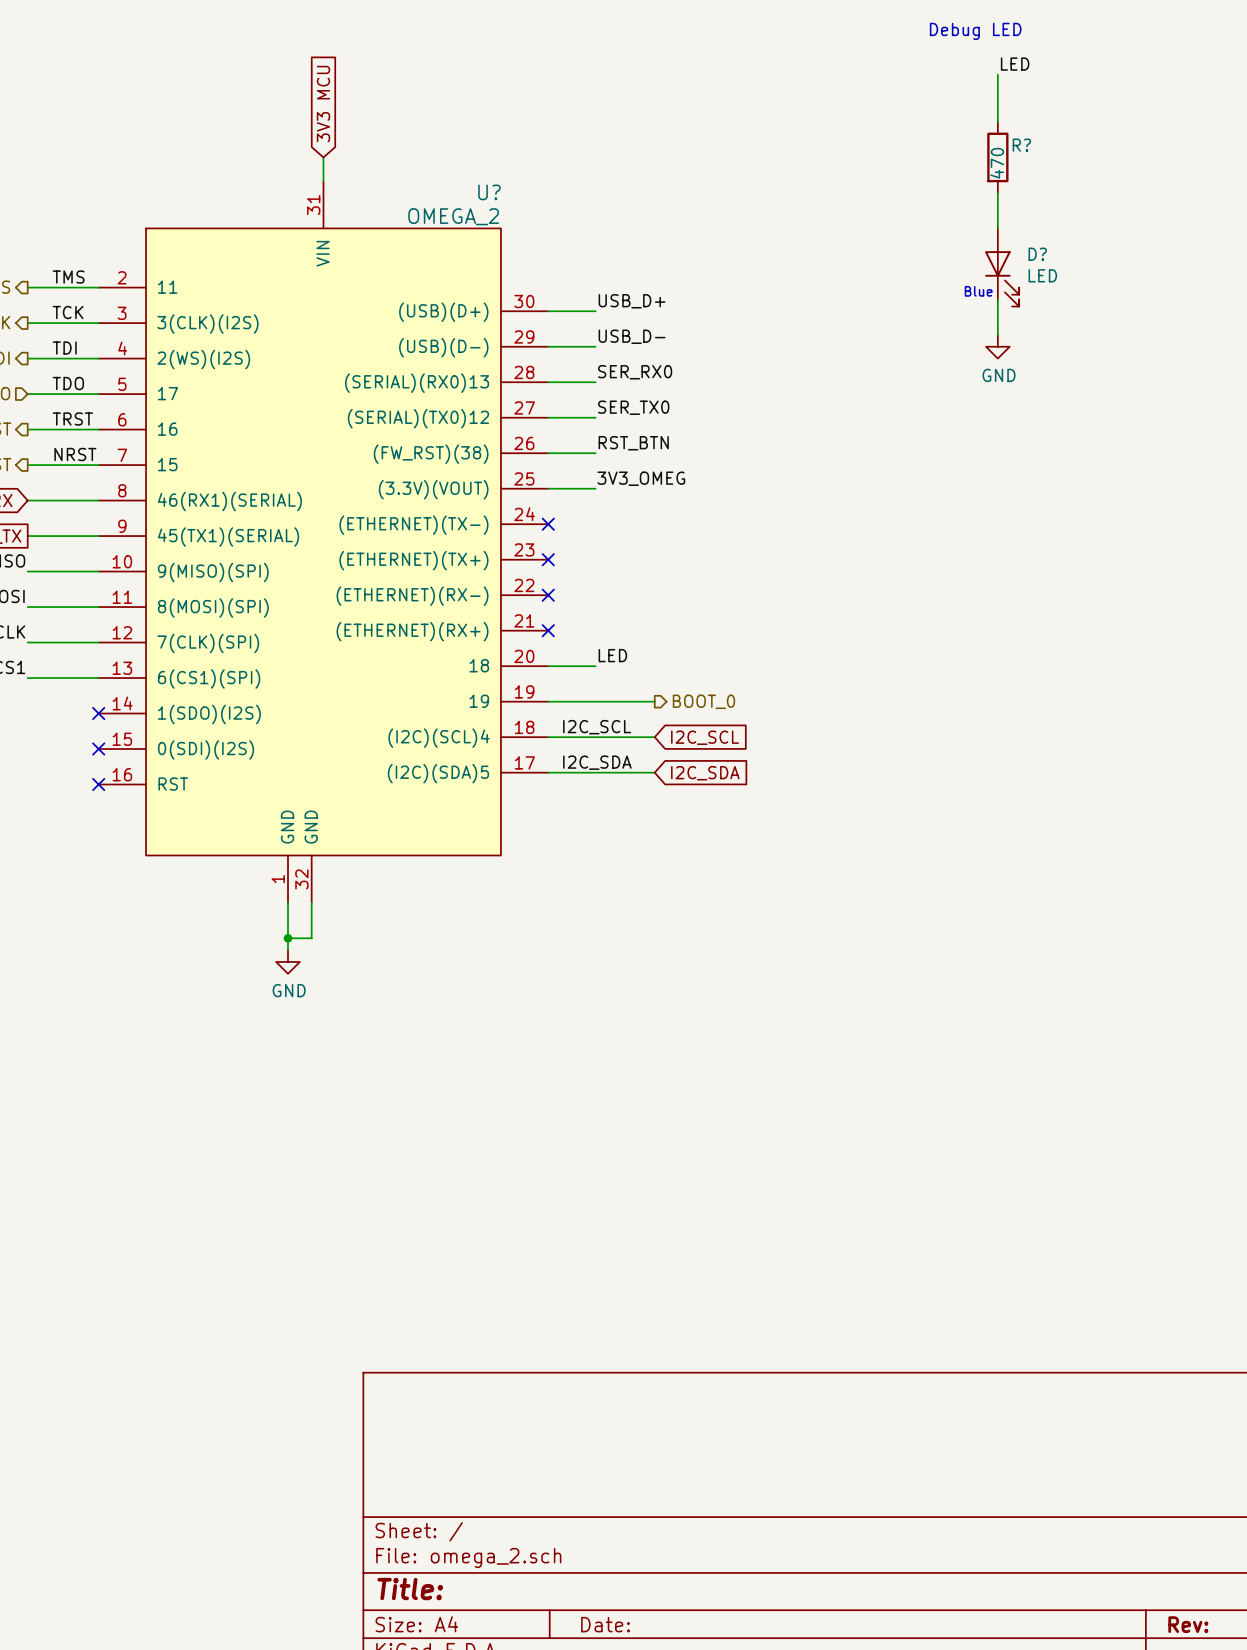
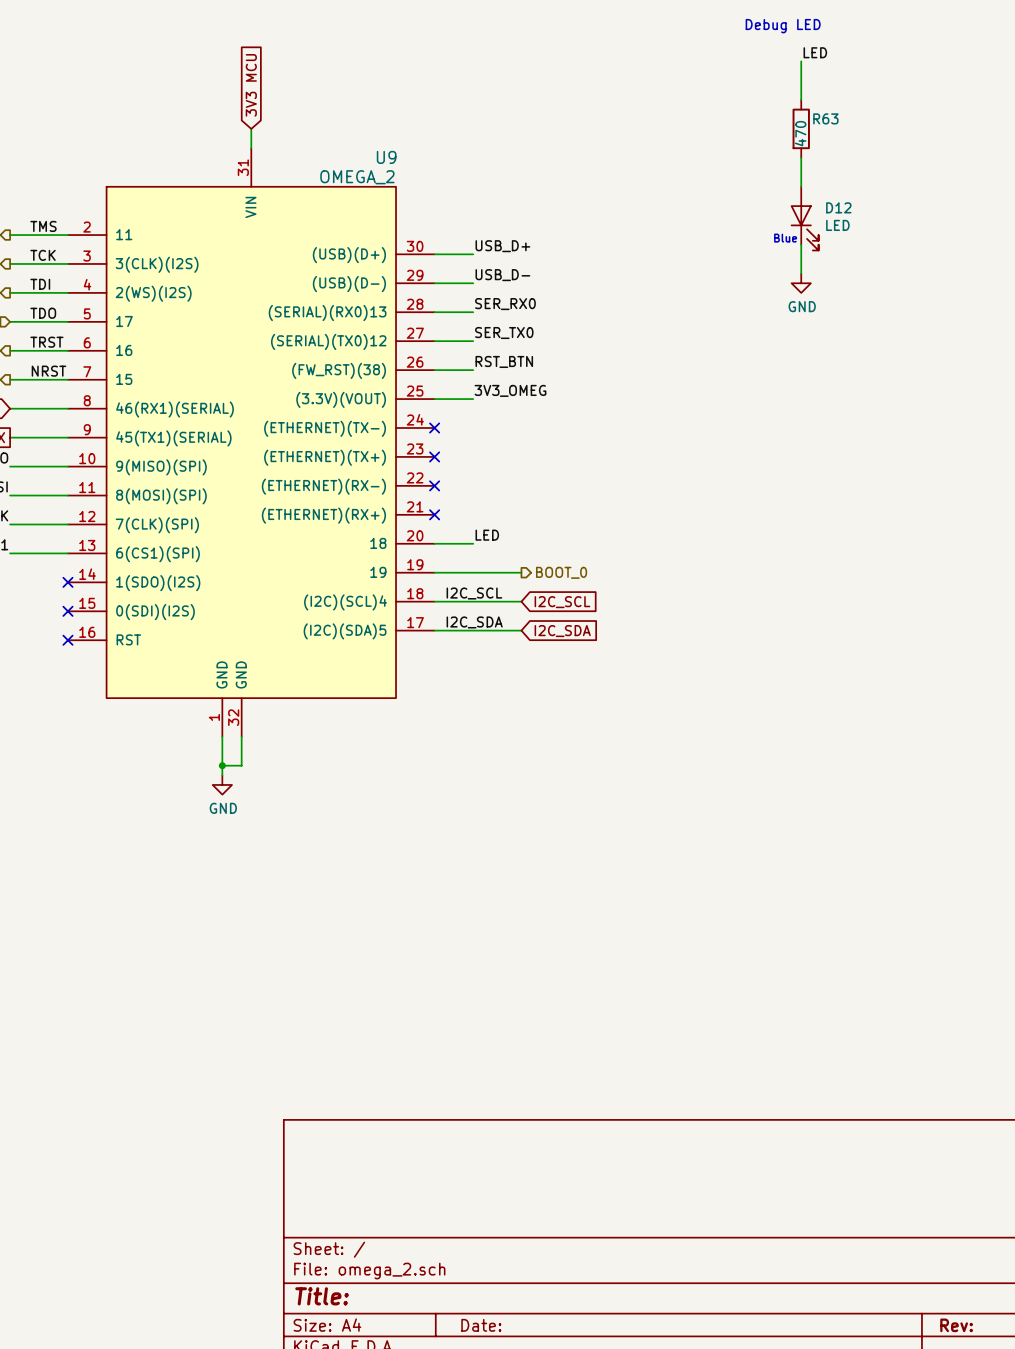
R? name: R? (1021, 145) -> R63 (825, 118)
U? name: U? (489, 192) -> U9 (386, 157)
D? name: D? (1037, 254) -> D12 (838, 207)

